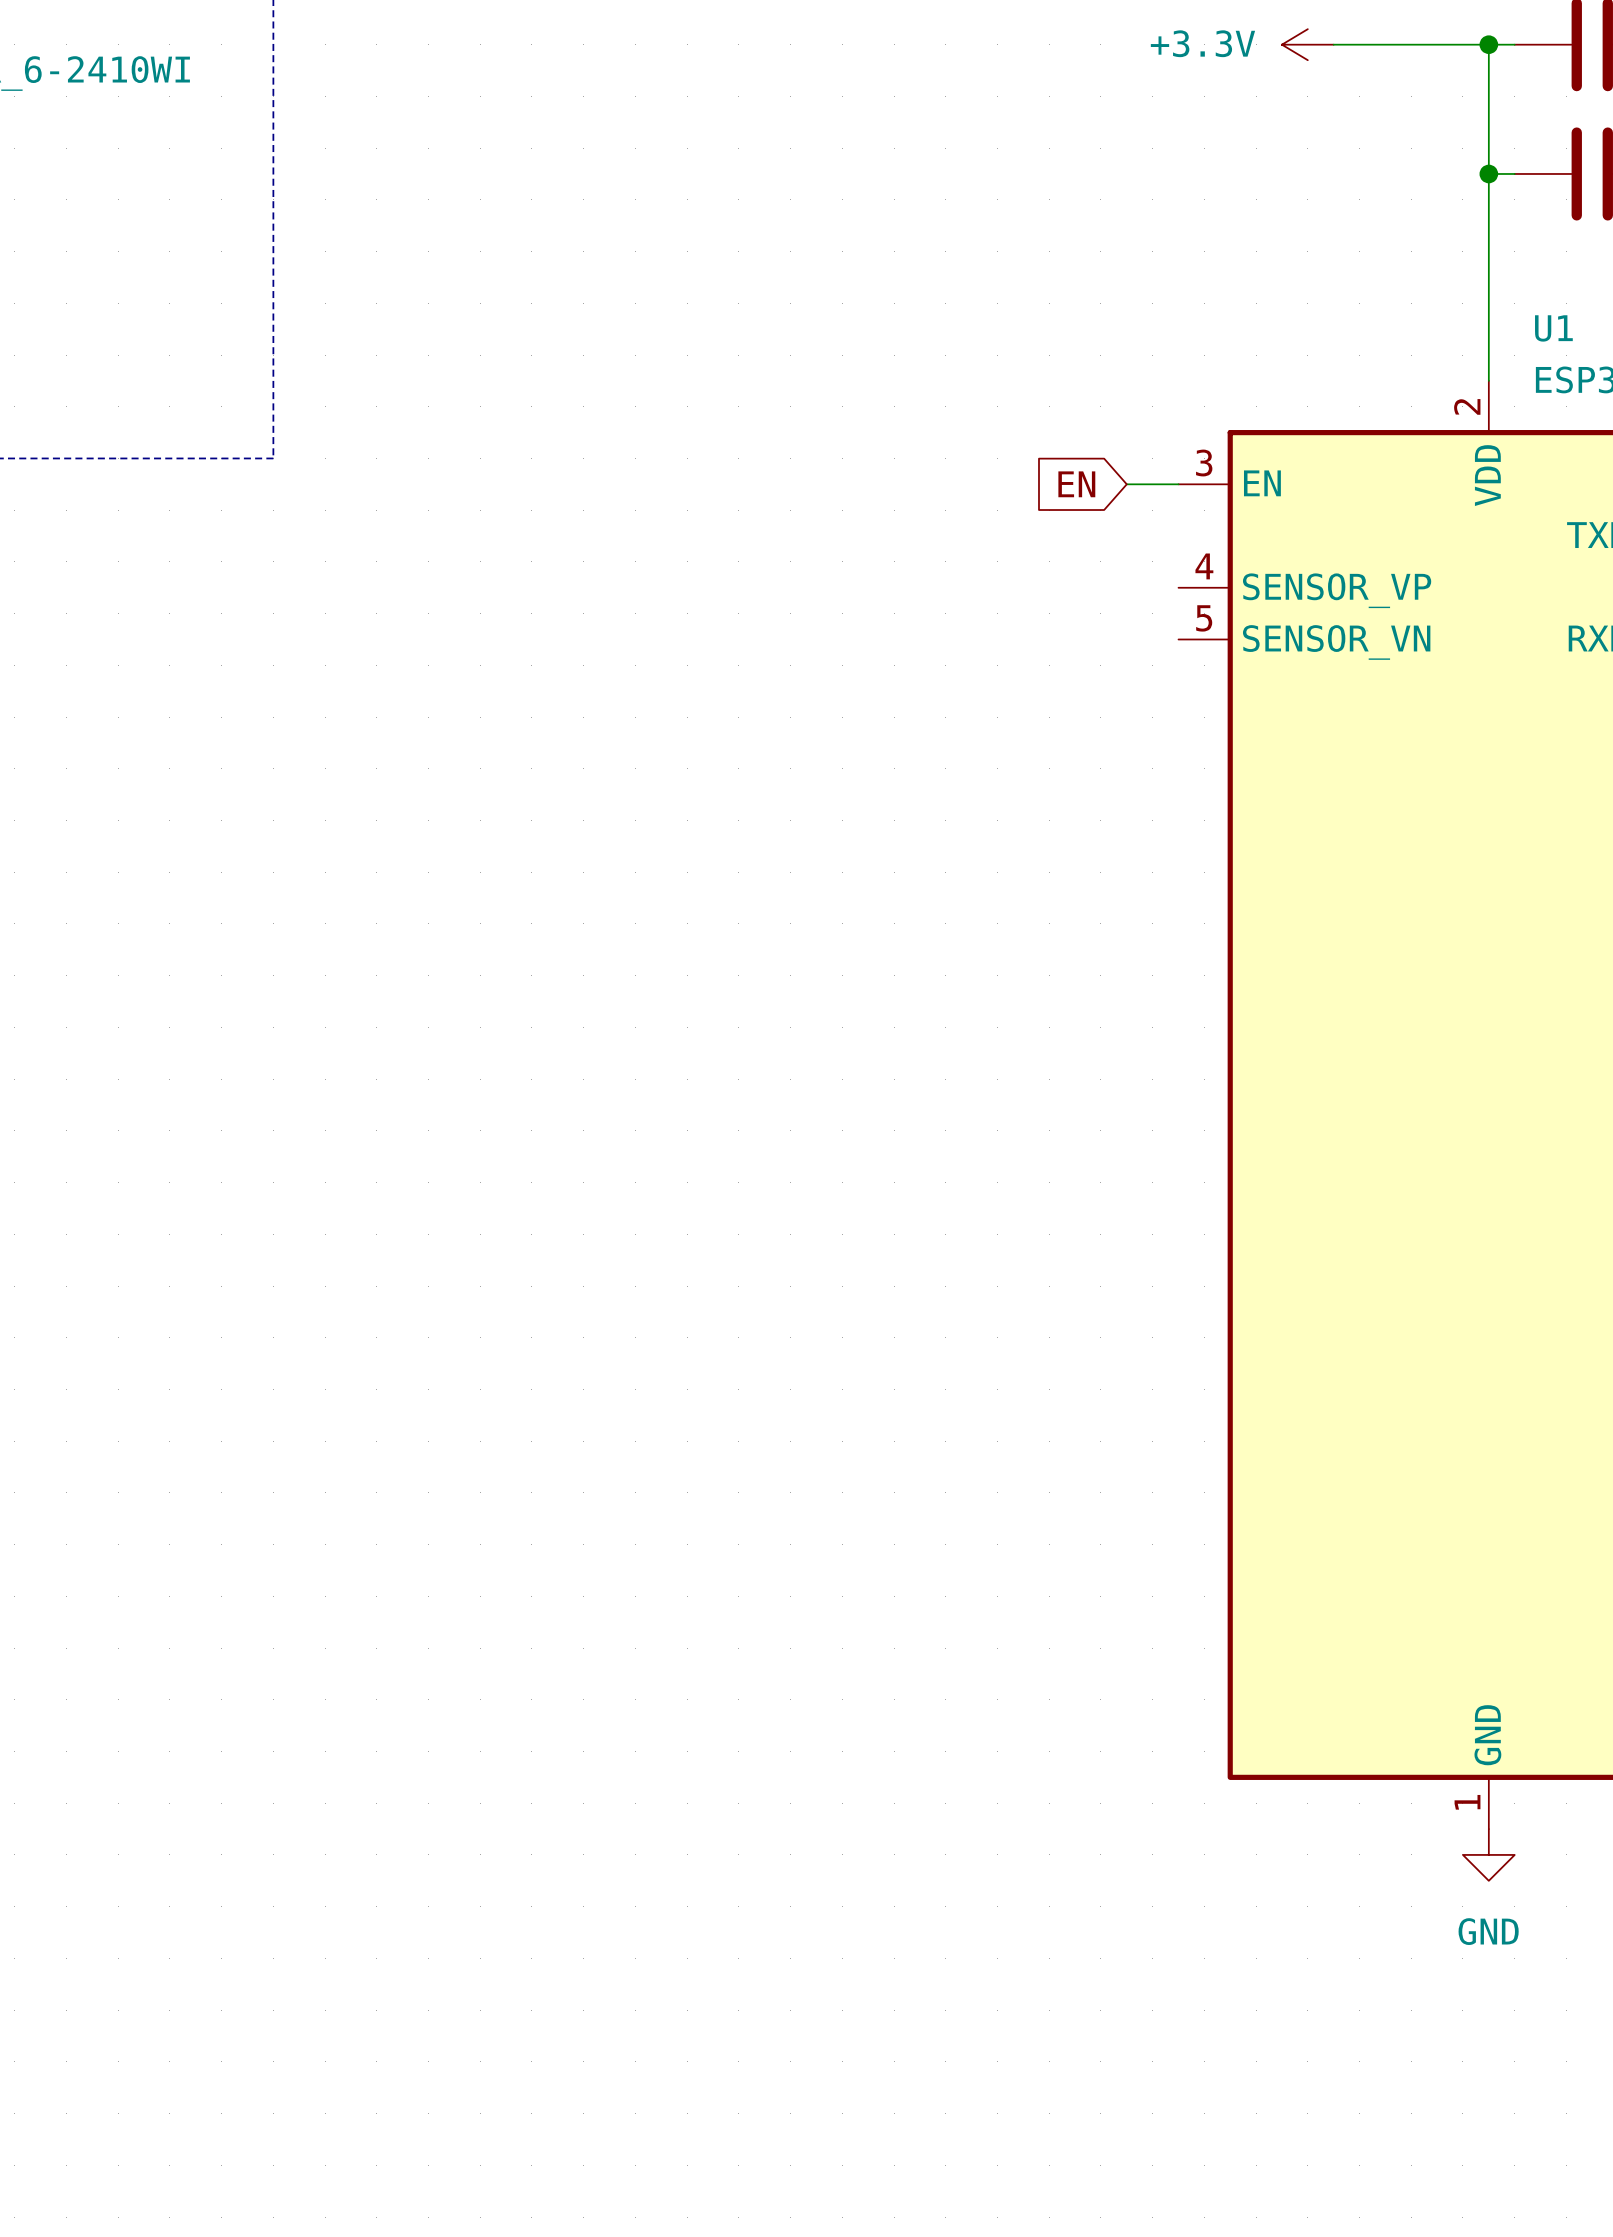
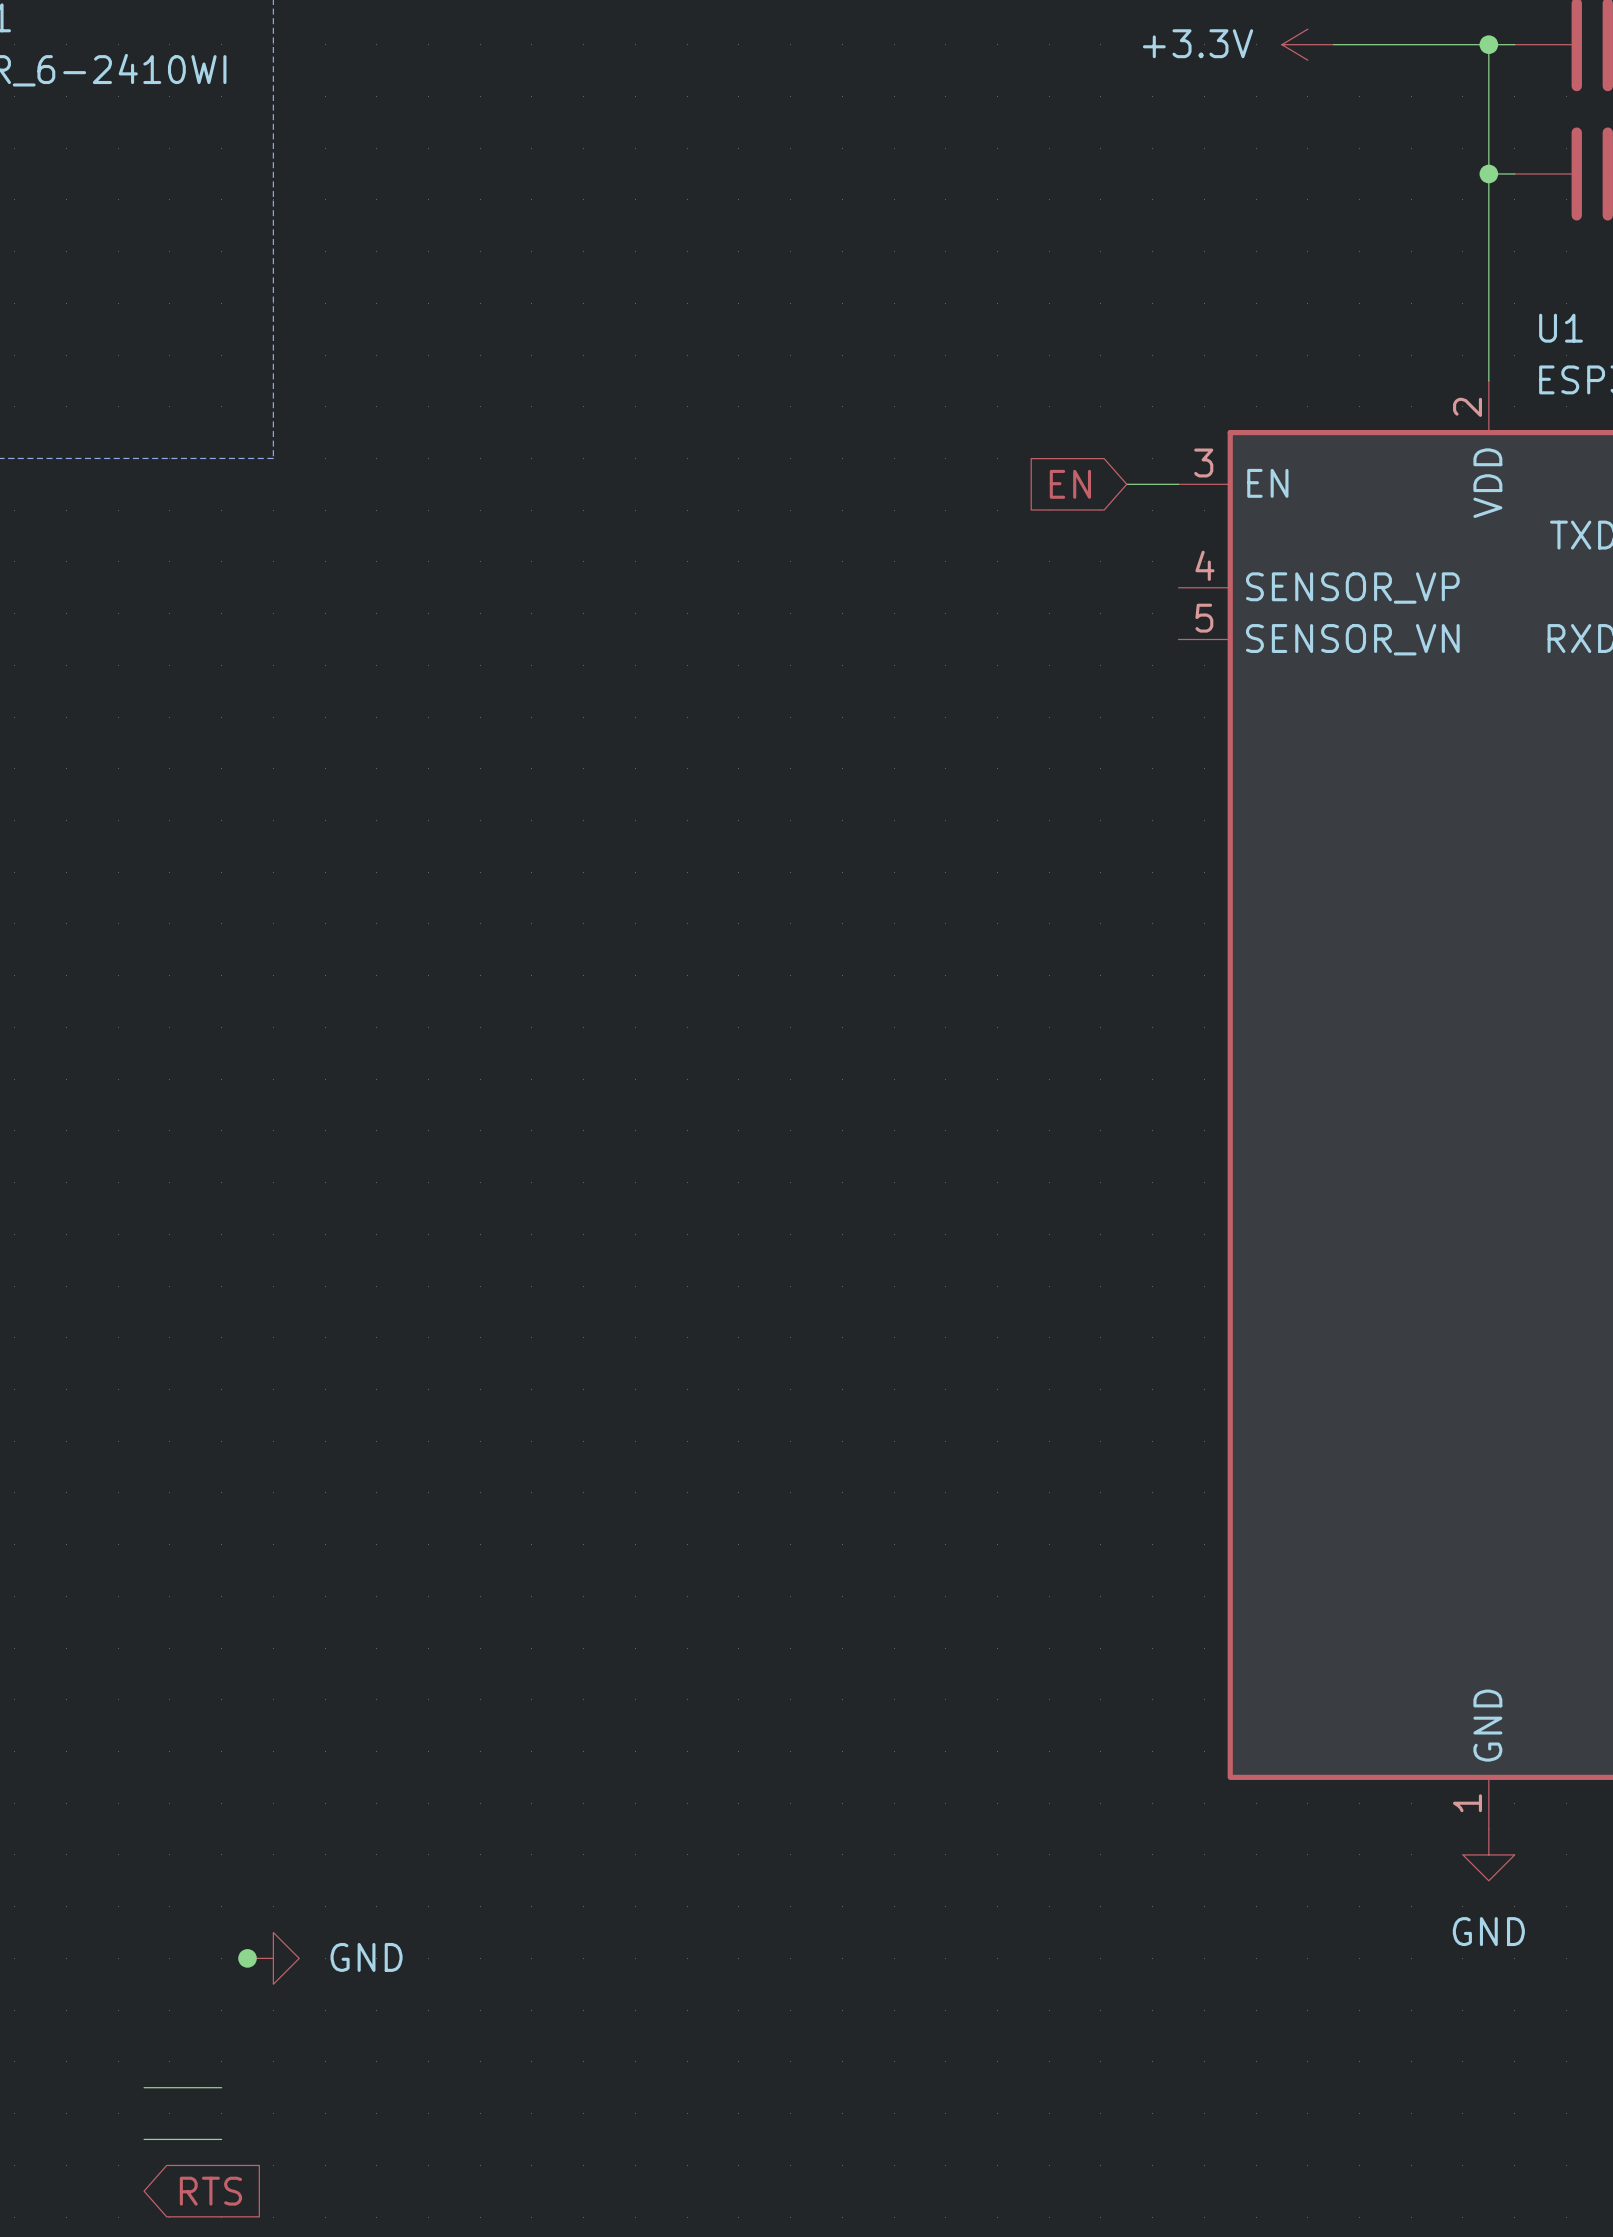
junction: none -> (247, 1958)
power symbol: none -> GND (273, 1958)
wire: none -> (144, 2087) (221, 2087)
wire: none -> (144, 2139) (221, 2139)
global label: none -> RTS (210, 2191)

